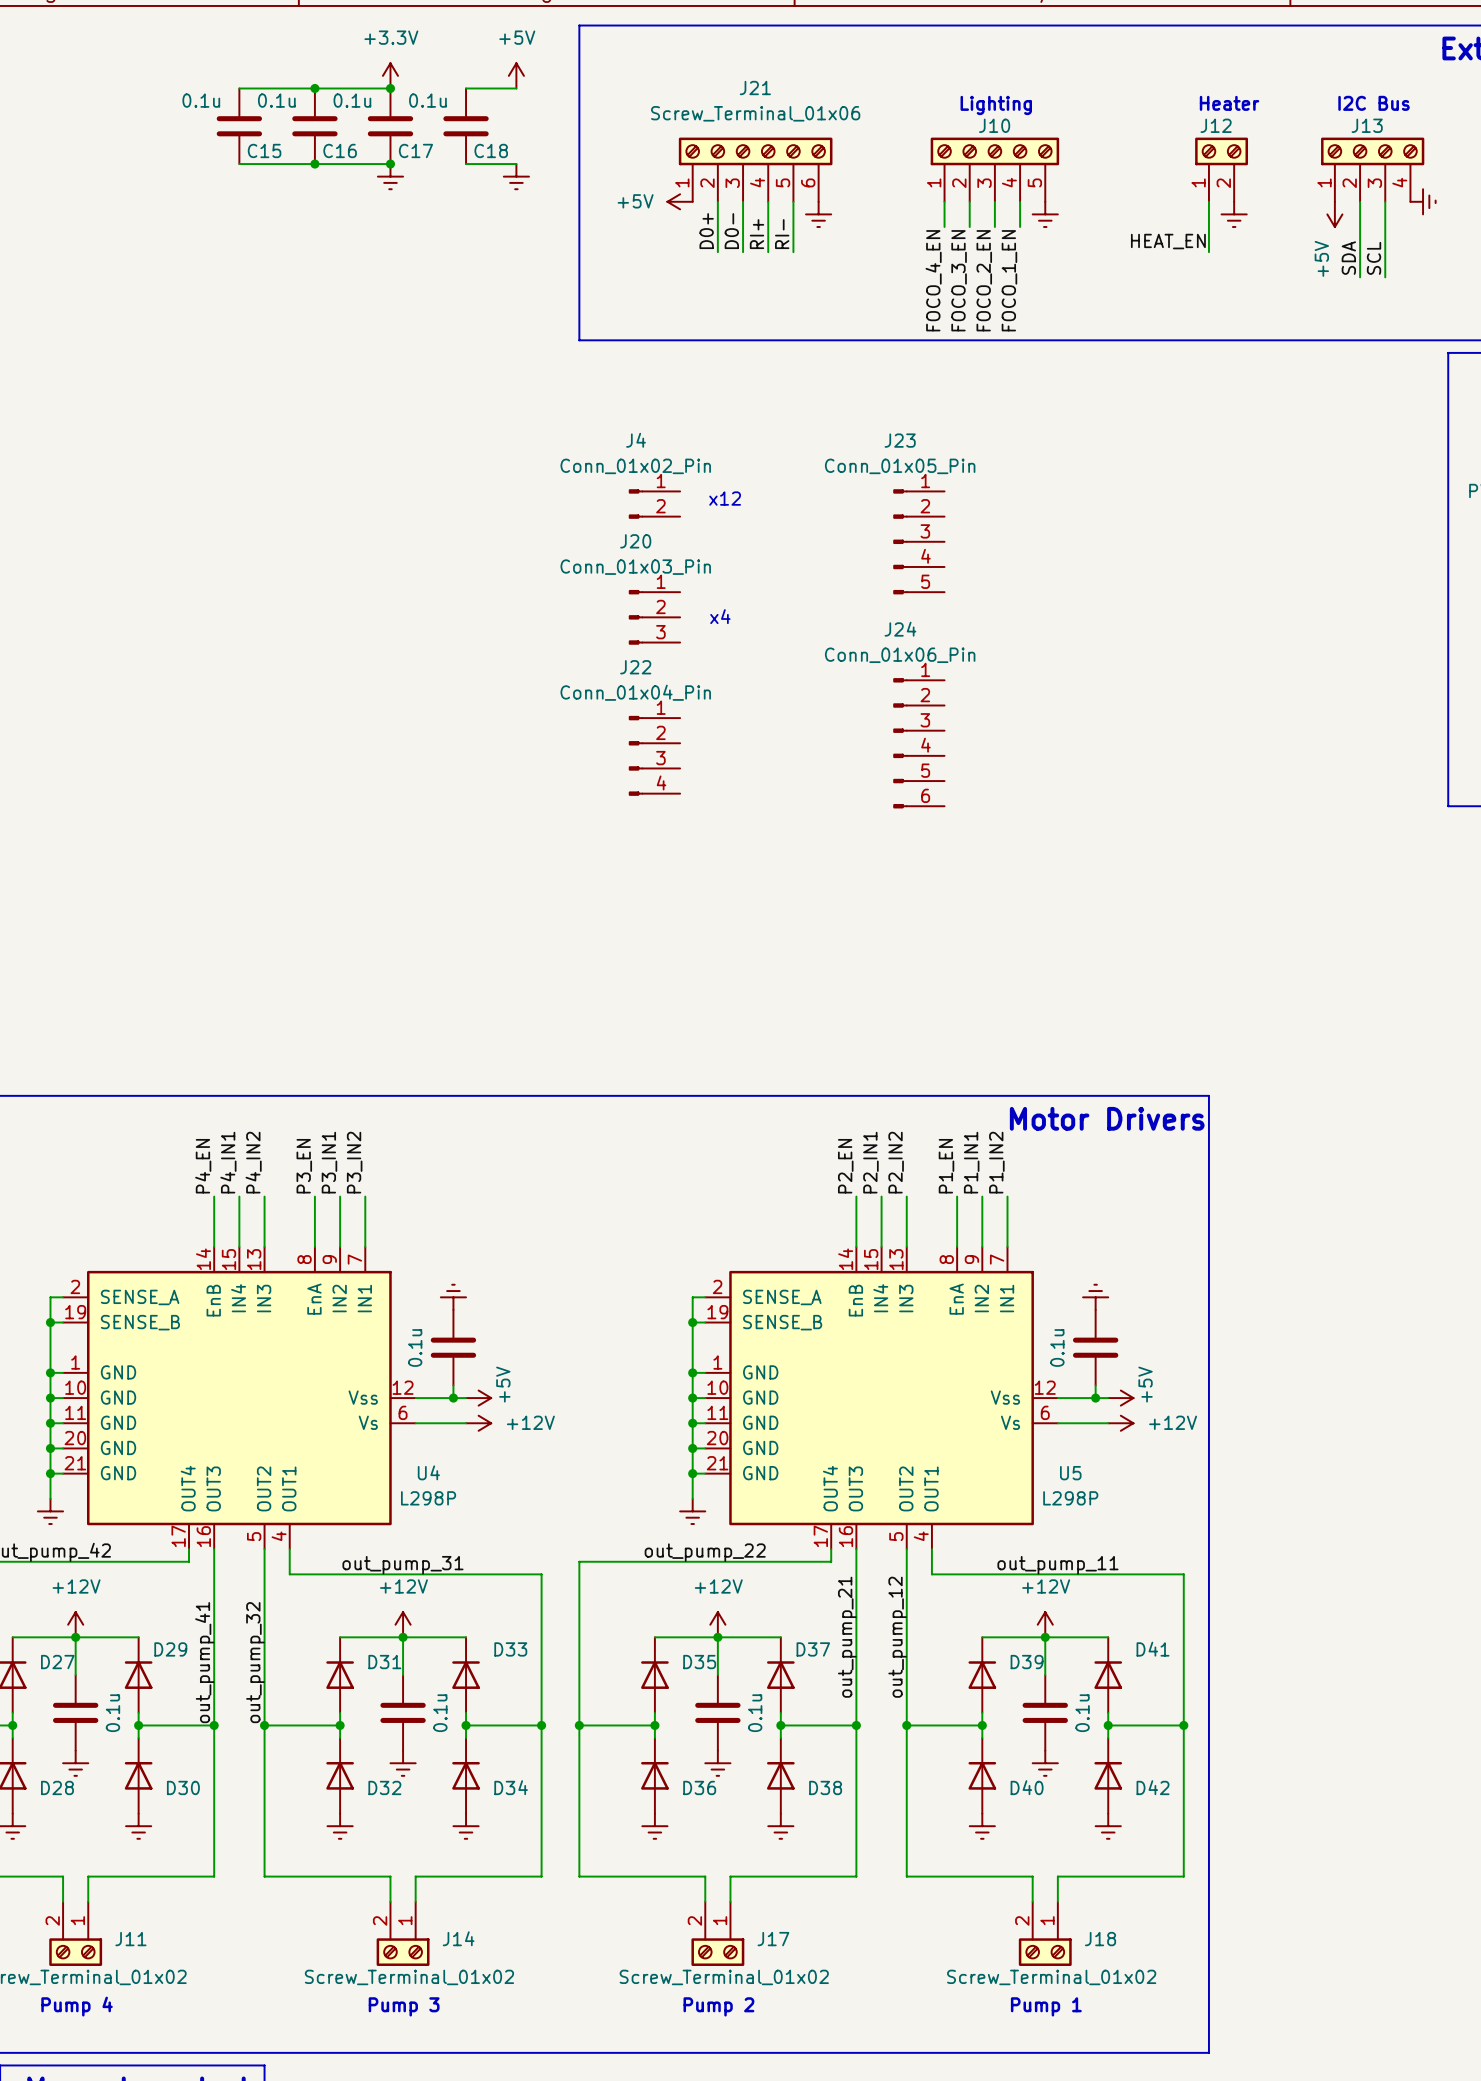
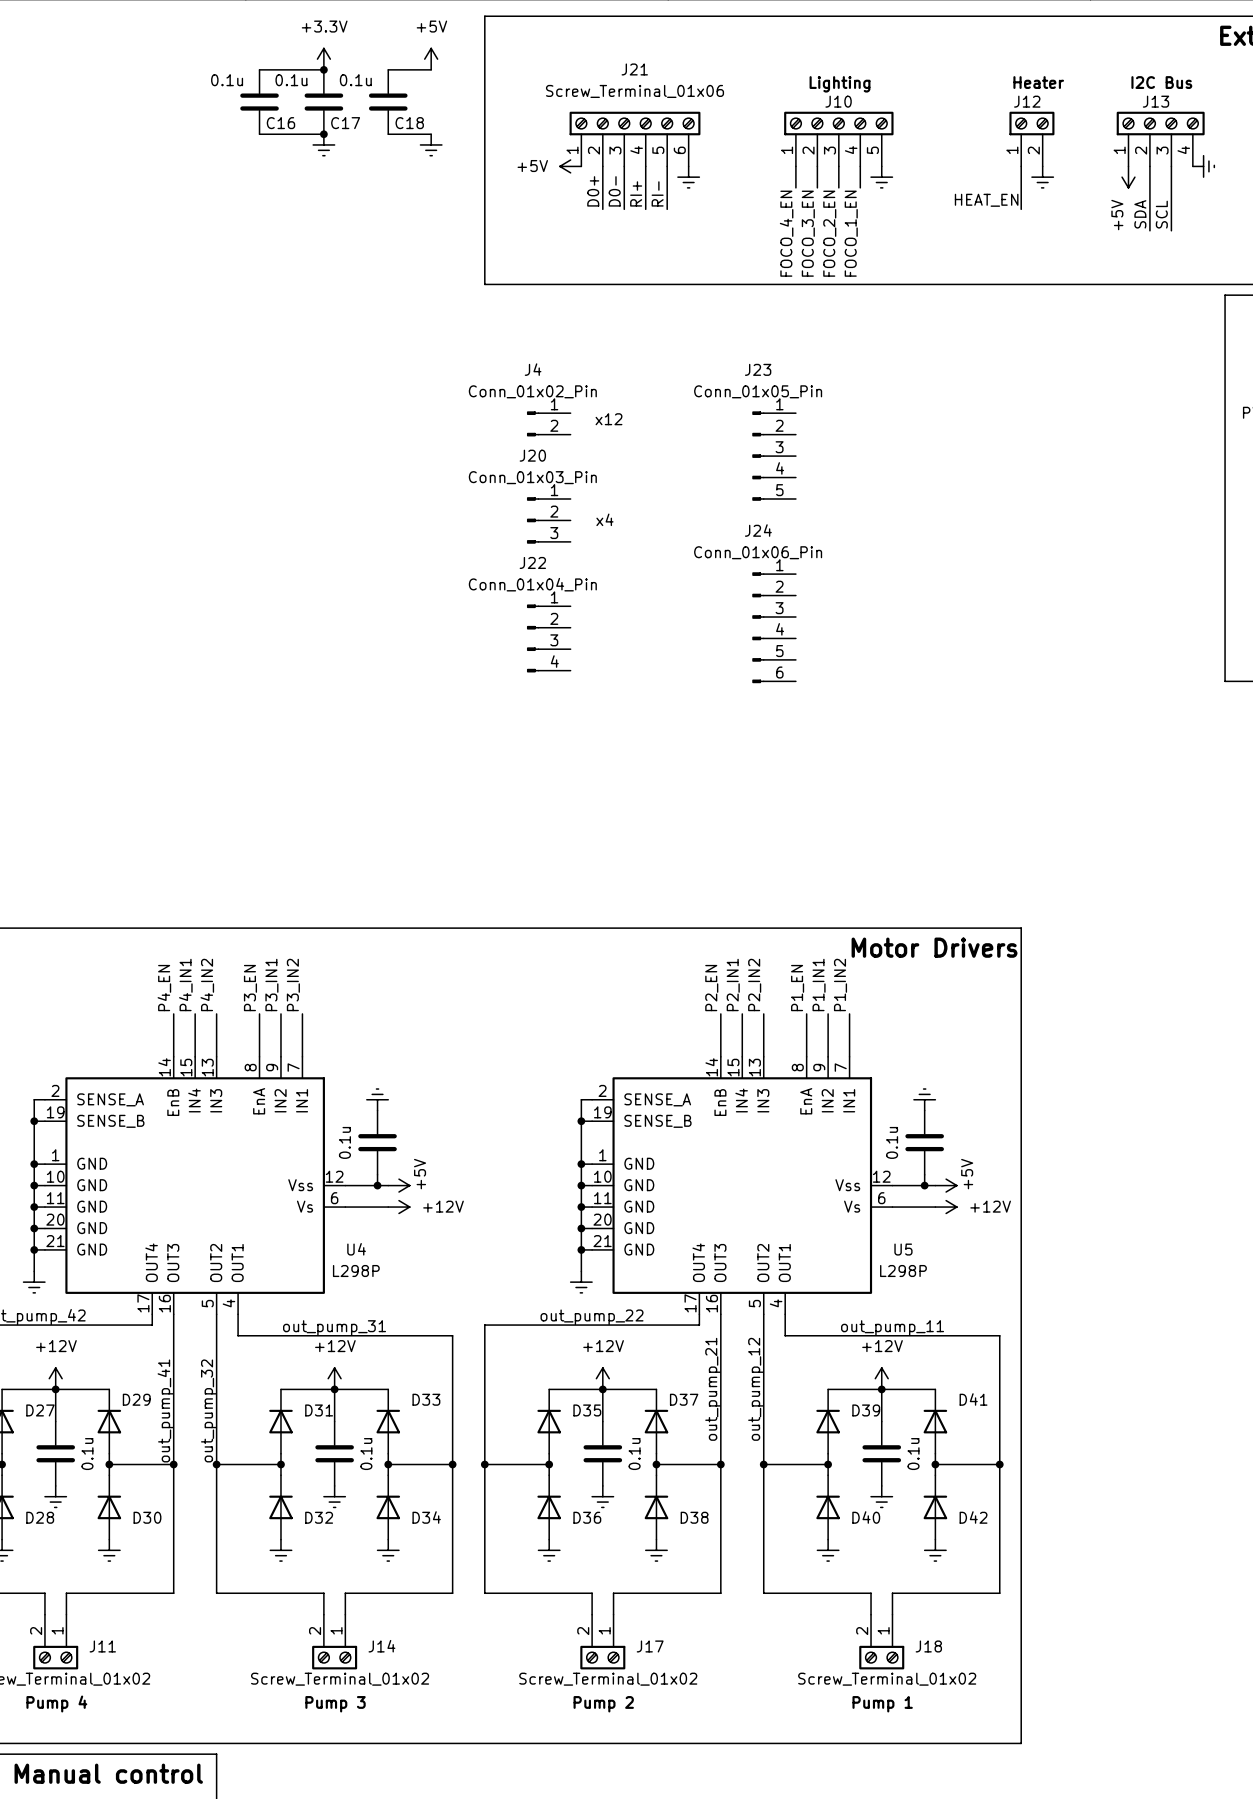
wire: (239, 88) (314, 88) -> none
junction: (314, 88) -> none
C15: 0.1u (239, 126) -> none
wire: (239, 164) (314, 164) -> none
junction: (314, 164) -> none

